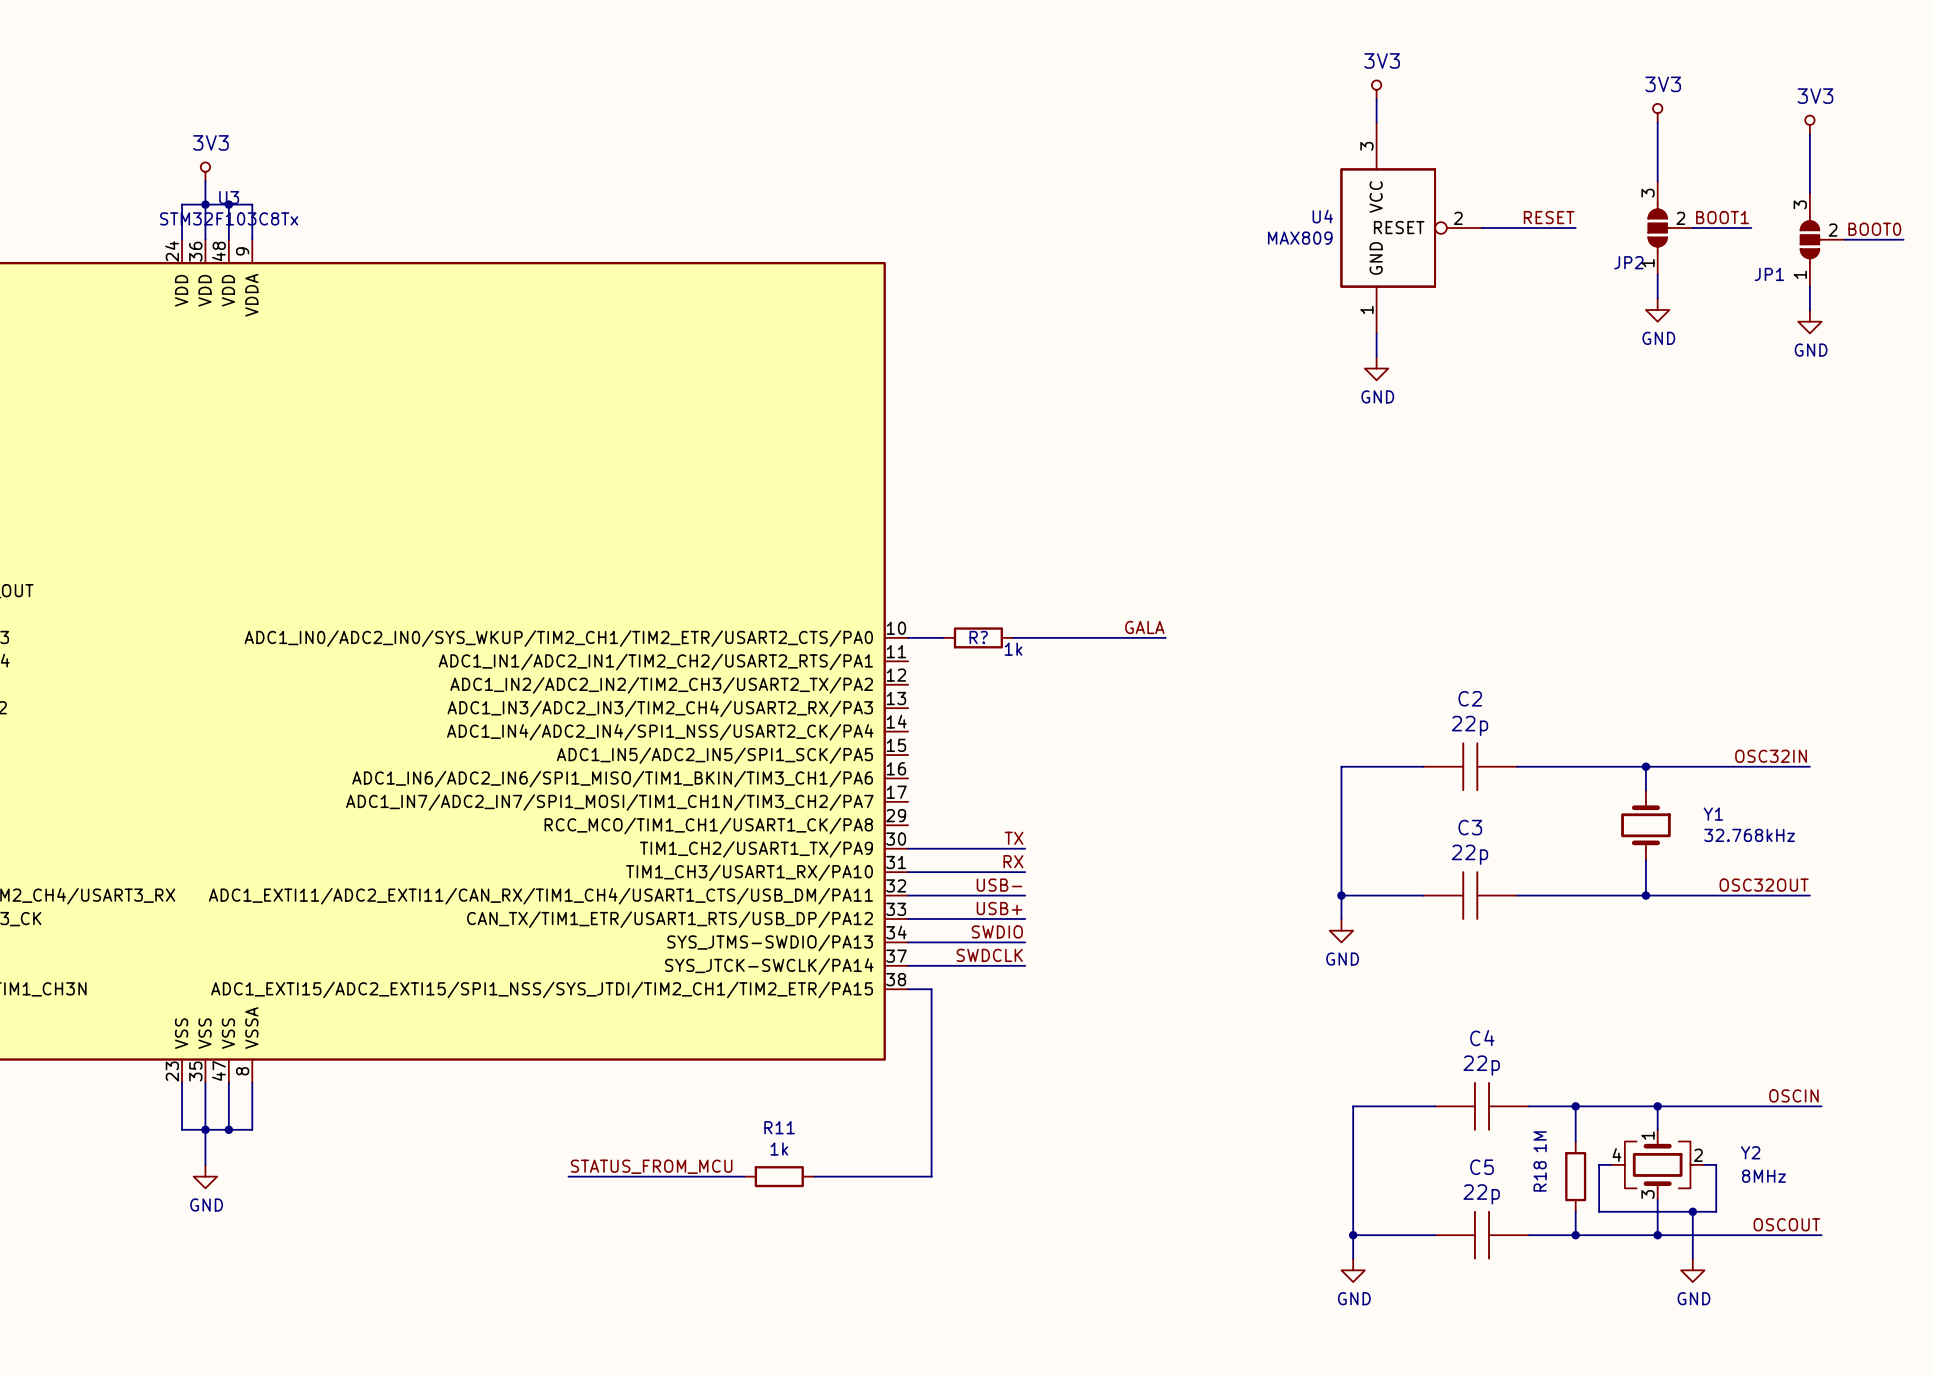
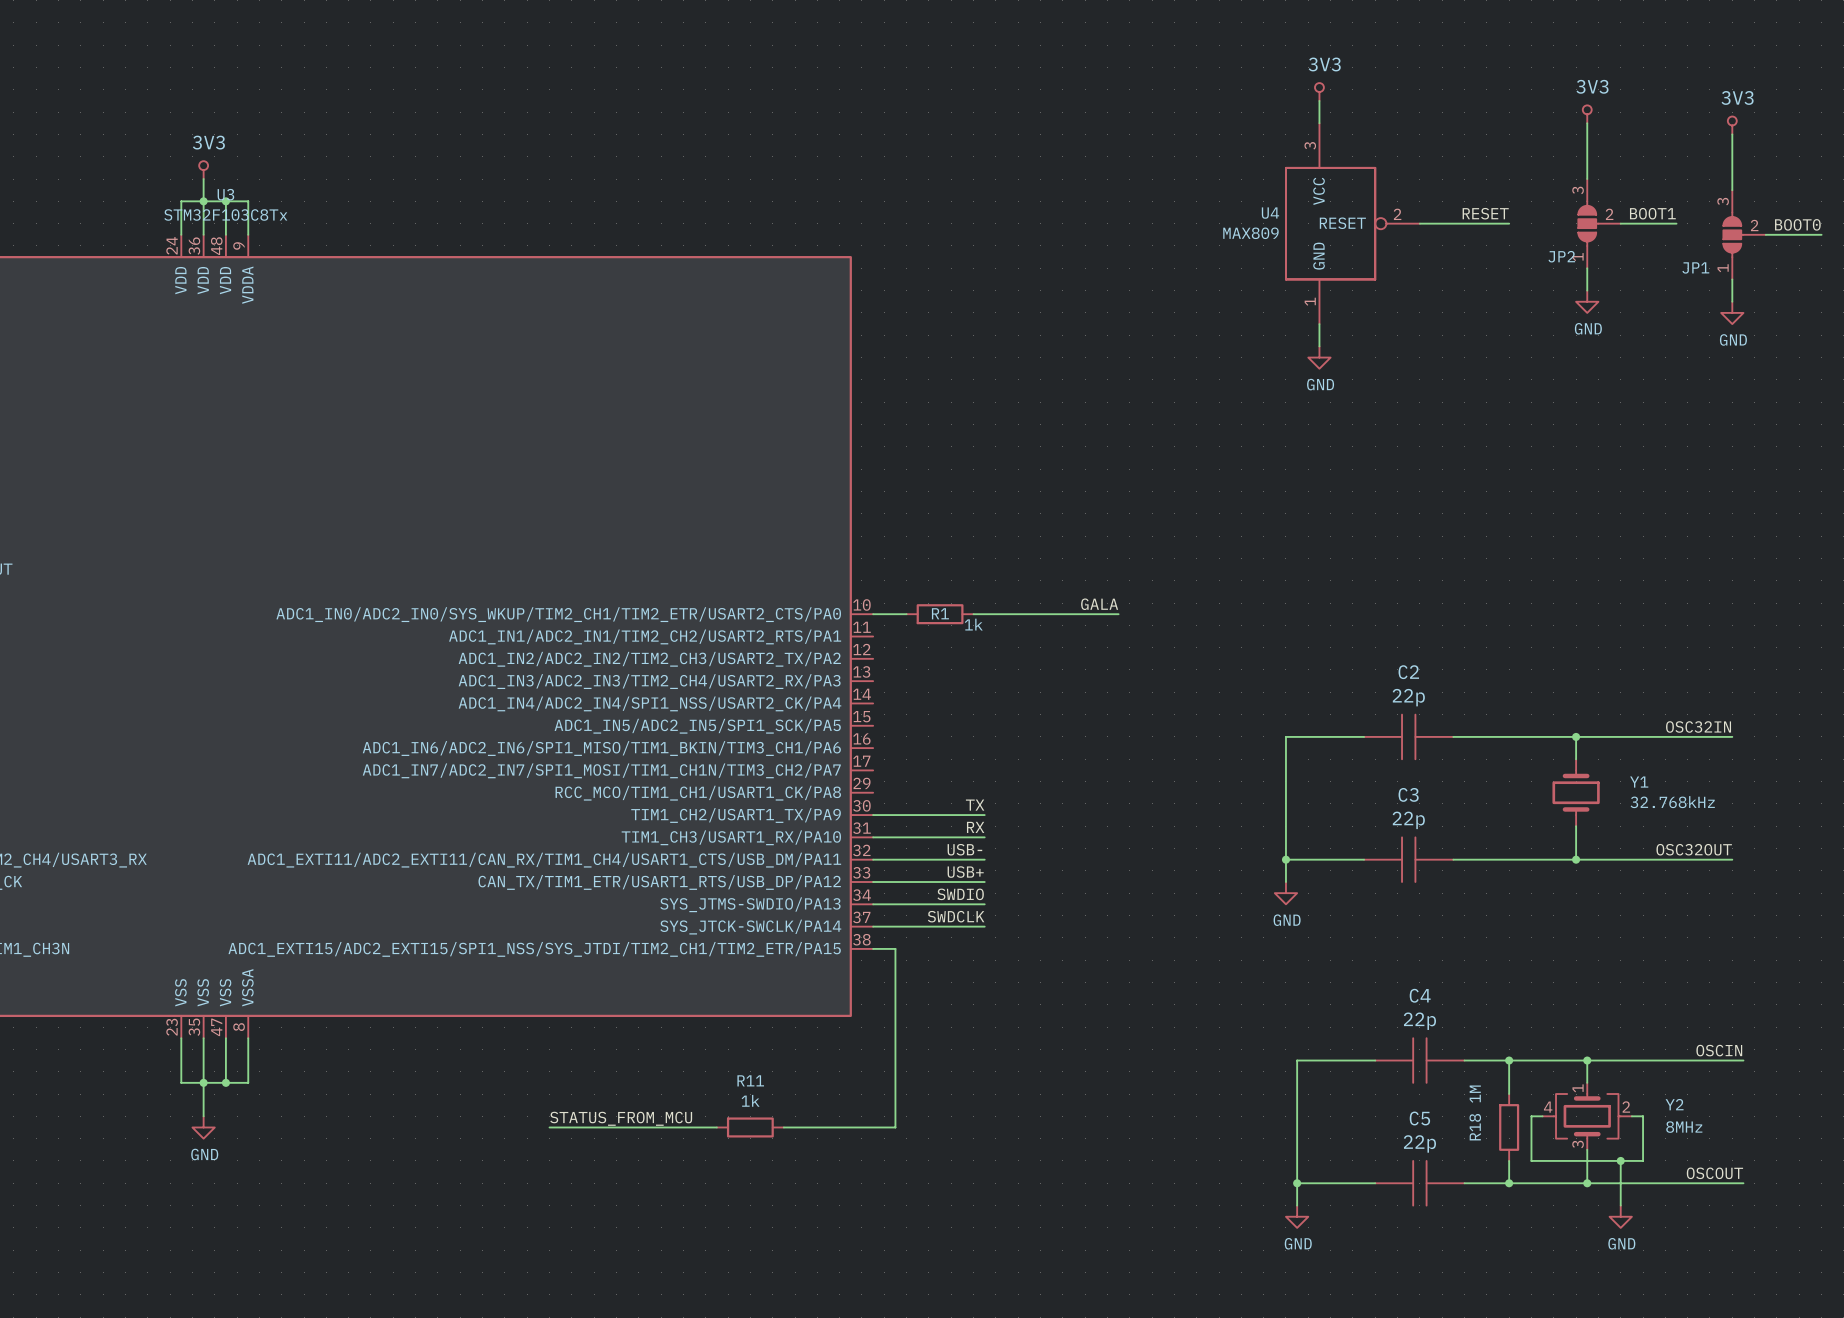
R? name: R? (978, 637) -> R1 (940, 613)

